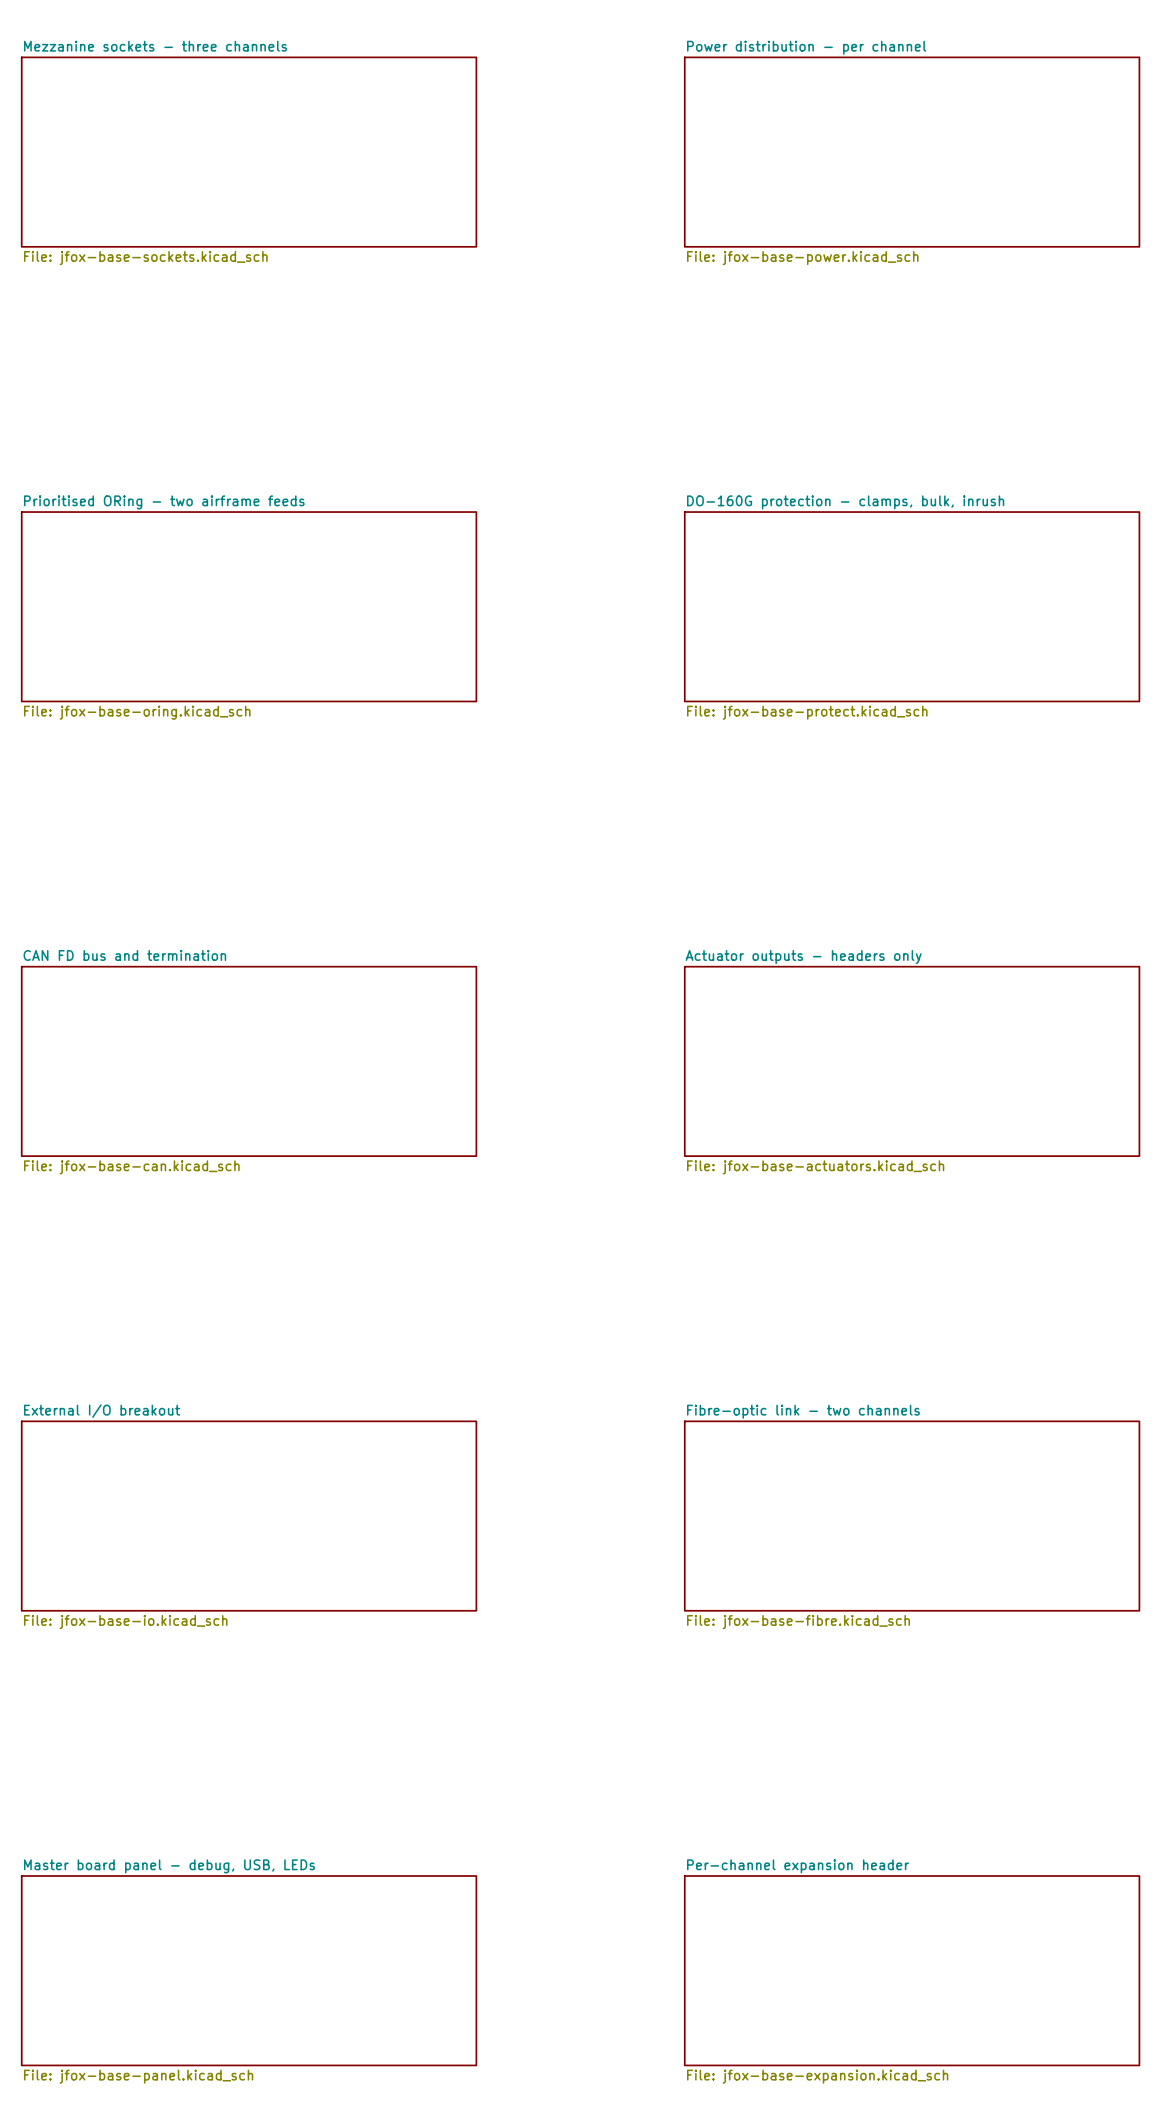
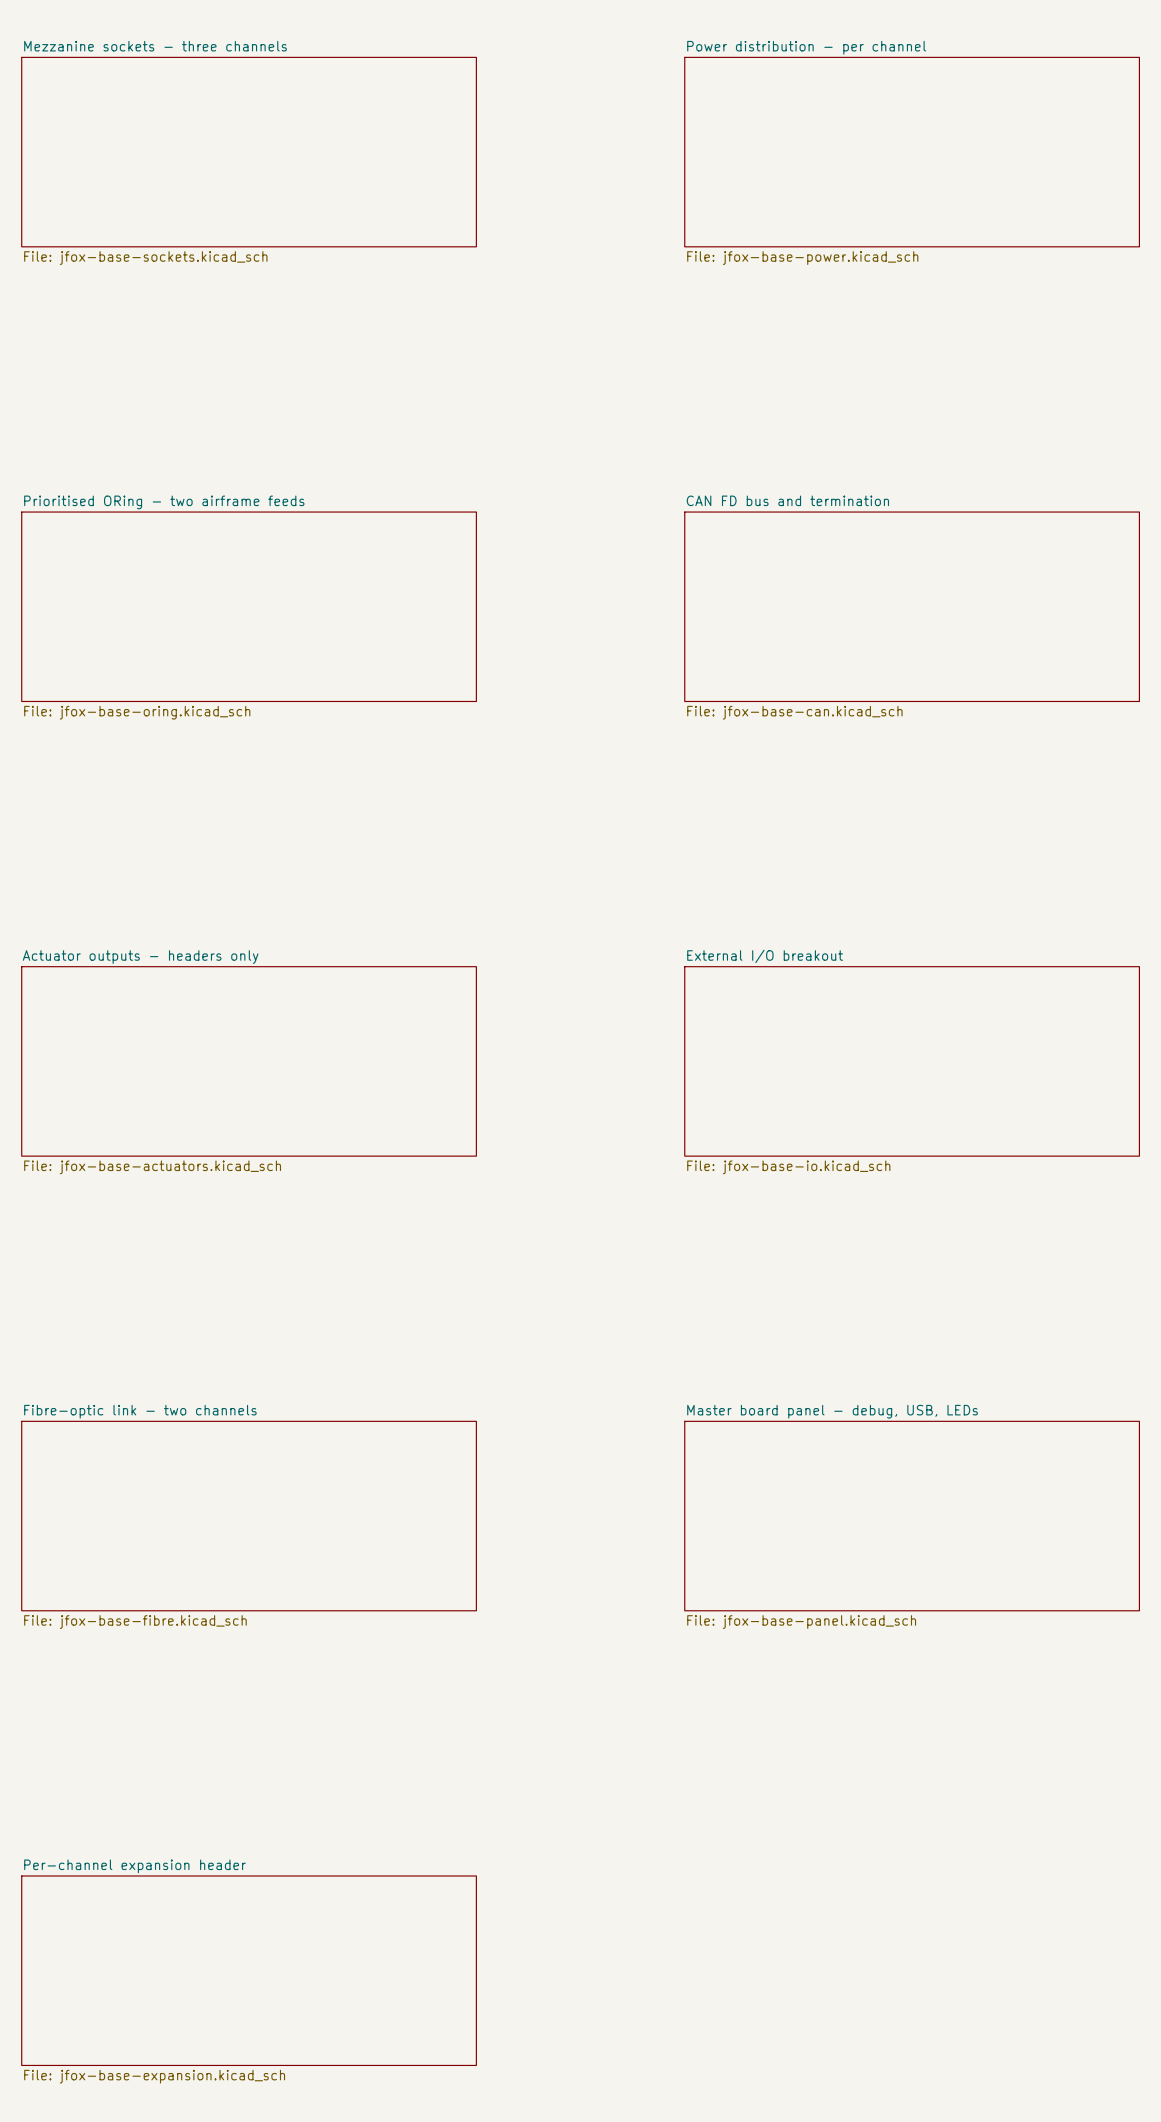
sheet DO-160G protection - clamps, bulk, inrush name: DO-160G protection - clamps, bulk, inrush (845, 502) -> CAN FD bus and termination (787, 500)
sheet DO-160G protection - clamps, bulk, inrush value: File: jfox-base-protect.kicad_sch (807, 712) -> File: jfox-base-can.kicad_sch (794, 712)
sheet CAN FD bus and termination name: CAN FD bus and termination (124, 955) -> Actuator outputs - headers only (140, 957)
sheet Actuator outputs - headers only name: Actuator outputs - headers only (803, 957) -> External I/O breakout (765, 956)
sheet CAN FD bus and termination value: File: jfox-base-can.kicad_sch (131, 1167) -> File: jfox-base-actuators.kicad_sch (152, 1167)
sheet Actuator outputs - headers only value: File: jfox-base-actuators.kicad_sch (815, 1167) -> File: jfox-base-io.kicad_sch (788, 1167)
sheet External I/O breakout name: External I/O breakout (102, 1411) -> Fibre-optic link - two channels (140, 1411)
sheet Fibre-optic link - two channels name: Fibre-optic link - two channels (803, 1411) -> Master board panel - debug, USB, LEDs (832, 1411)
sheet External I/O breakout value: File: jfox-base-io.kicad_sch (125, 1622) -> File: jfox-base-fibre.kicad_sch (135, 1622)
sheet Fibre-optic link - two channels value: File: jfox-base-fibre.kicad_sch (798, 1622) -> File: jfox-base-panel.kicad_sch (801, 1622)
sheet Master board panel - debug, USB, LEDs name: Master board panel - debug, USB, LEDs (169, 1866) -> Per-channel expansion header (135, 1866)
sheet Per-channel expansion header: File: jfox-base-expansion.kicad_sch (912, 1970) -> none
sheet Master board panel - debug, USB, LEDs value: File: jfox-base-panel.kicad_sch (138, 2076) -> File: jfox-base-expansion.kicad_sch (154, 2076)

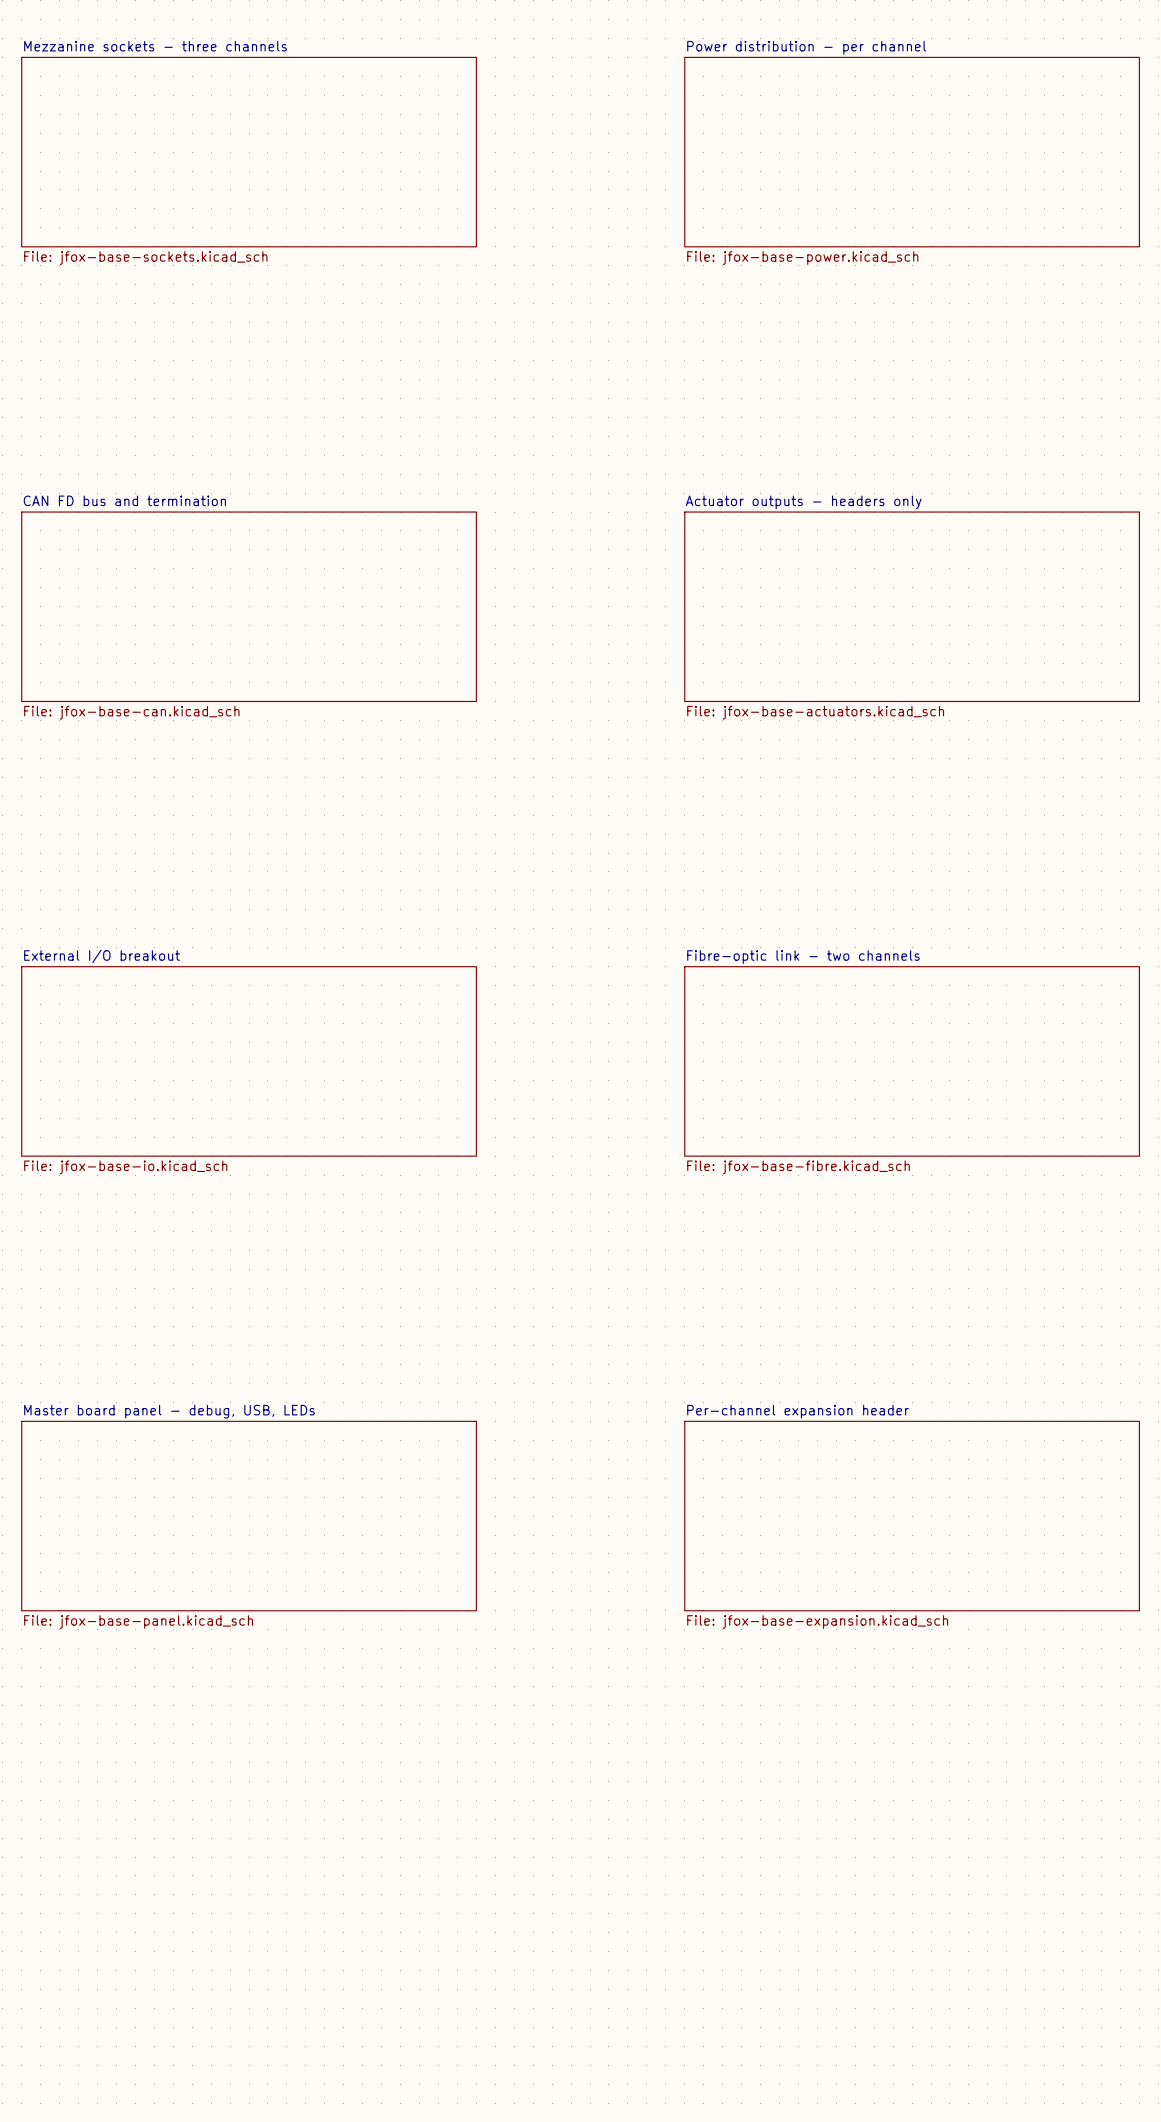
sheet CAN FD bus and termination name: CAN FD bus and termination (787, 500) -> Actuator outputs - headers only (803, 502)
sheet Prioritised ORing - two airframe feeds name: Prioritised ORing - two airframe feeds (164, 502) -> CAN FD bus and termination (124, 500)
sheet Prioritised ORing - two airframe feeds value: File: jfox-base-oring.kicad_sch (137, 712) -> File: jfox-base-can.kicad_sch (131, 712)
sheet CAN FD bus and termination value: File: jfox-base-can.kicad_sch (794, 712) -> File: jfox-base-actuators.kicad_sch (815, 712)
sheet External I/O breakout name: External I/O breakout (765, 956) -> Fibre-optic link - two channels (803, 957)
sheet Actuator outputs - headers only name: Actuator outputs - headers only (140, 957) -> External I/O breakout (102, 956)
sheet Actuator outputs - headers only value: File: jfox-base-actuators.kicad_sch (152, 1167) -> File: jfox-base-io.kicad_sch (125, 1167)
sheet External I/O breakout value: File: jfox-base-io.kicad_sch (788, 1167) -> File: jfox-base-fibre.kicad_sch (798, 1167)
sheet Fibre-optic link - two channels name: Fibre-optic link - two channels (140, 1411) -> Master board panel - debug, USB, LEDs (169, 1411)
sheet Master board panel - debug, USB, LEDs name: Master board panel - debug, USB, LEDs (832, 1411) -> Per-channel expansion header (798, 1411)
sheet Fibre-optic link - two channels value: File: jfox-base-fibre.kicad_sch (135, 1622) -> File: jfox-base-panel.kicad_sch (138, 1622)
sheet Master board panel - debug, USB, LEDs value: File: jfox-base-panel.kicad_sch (801, 1622) -> File: jfox-base-expansion.kicad_sch (817, 1622)
sheet Per-channel expansion header: File: jfox-base-expansion.kicad_sch (249, 1970) -> none

